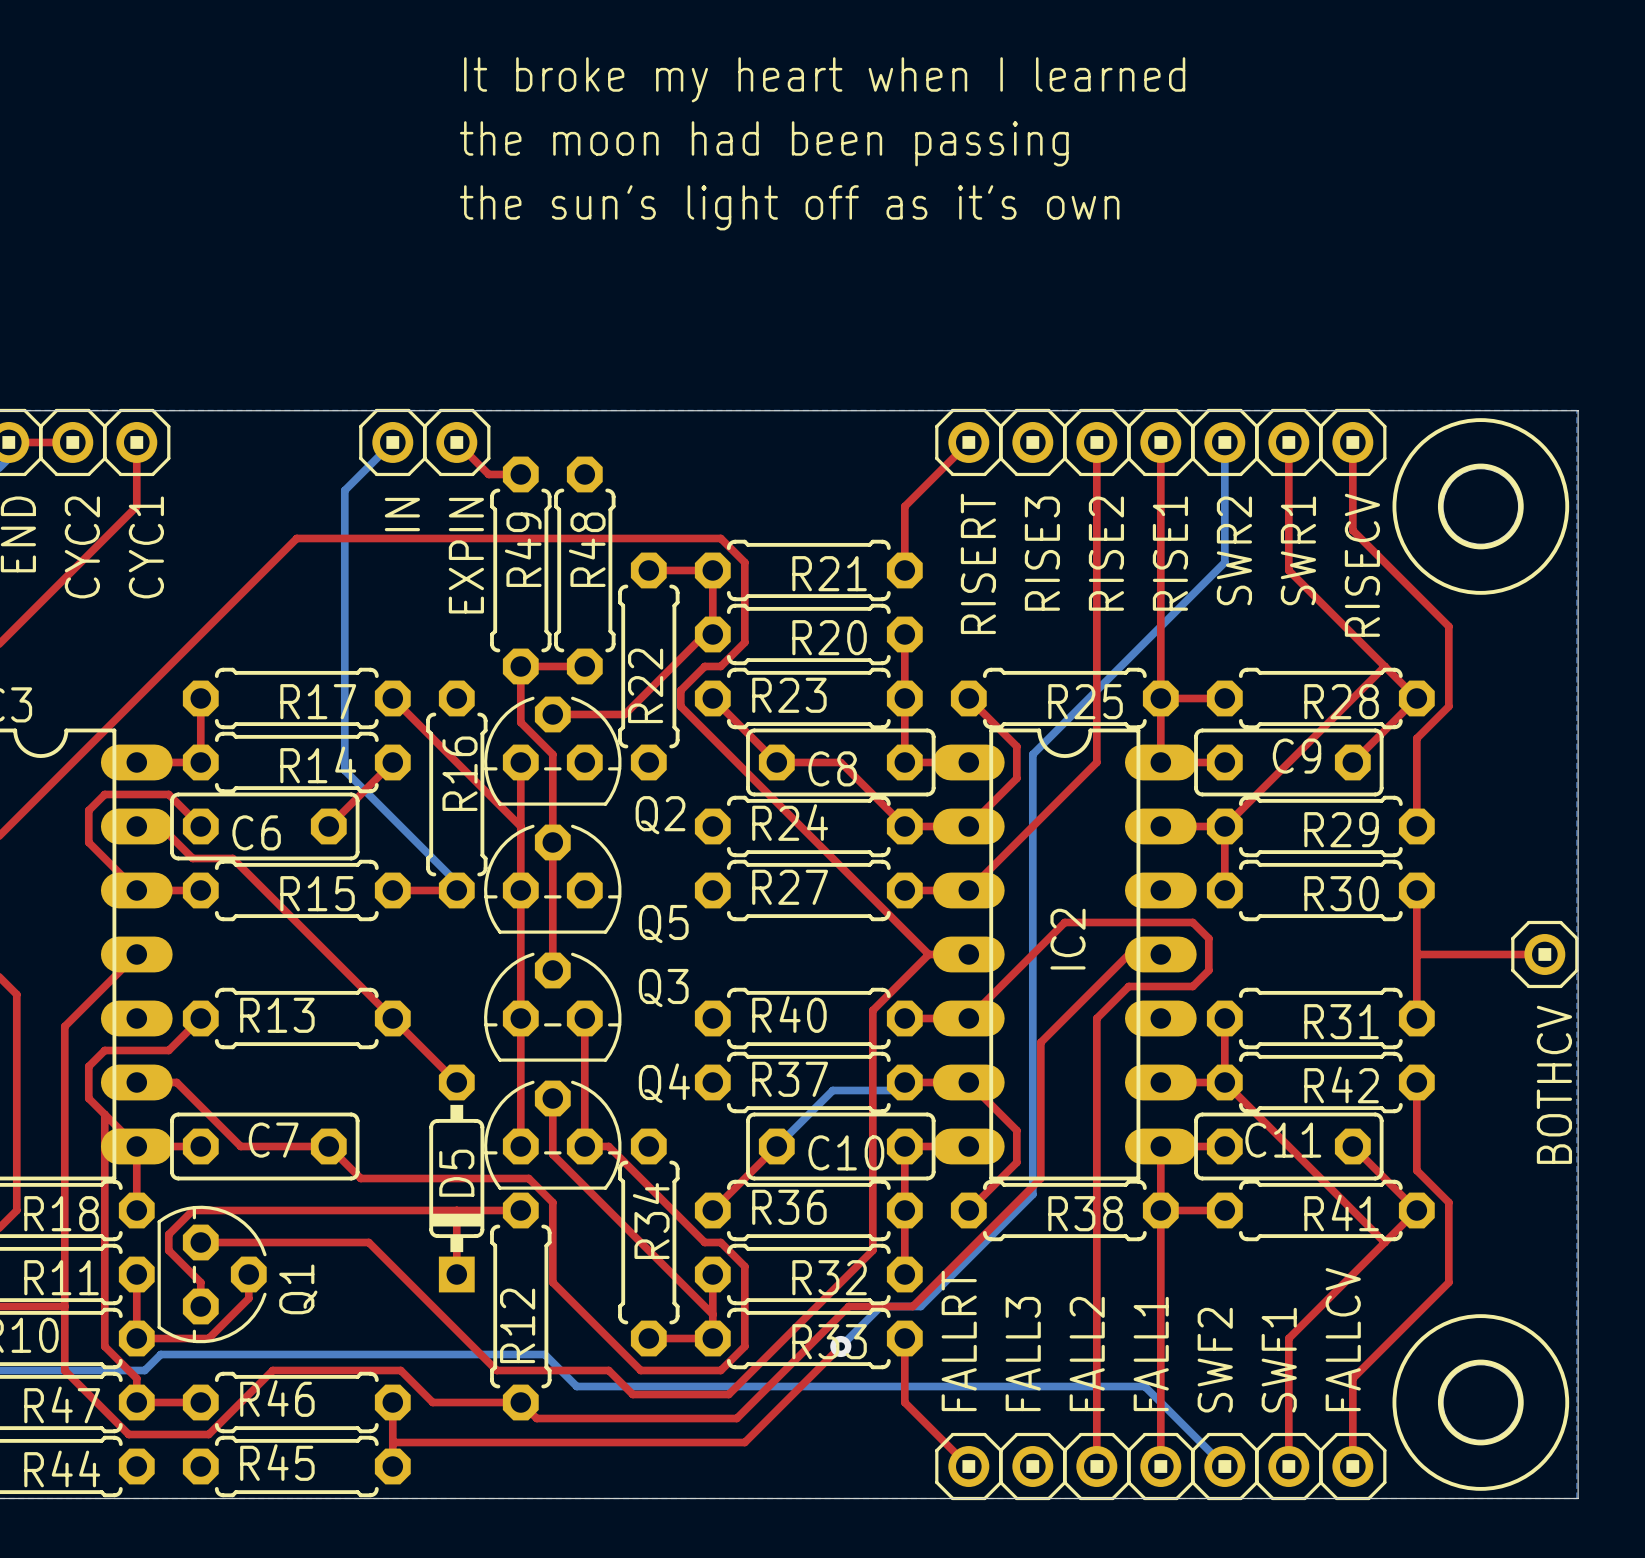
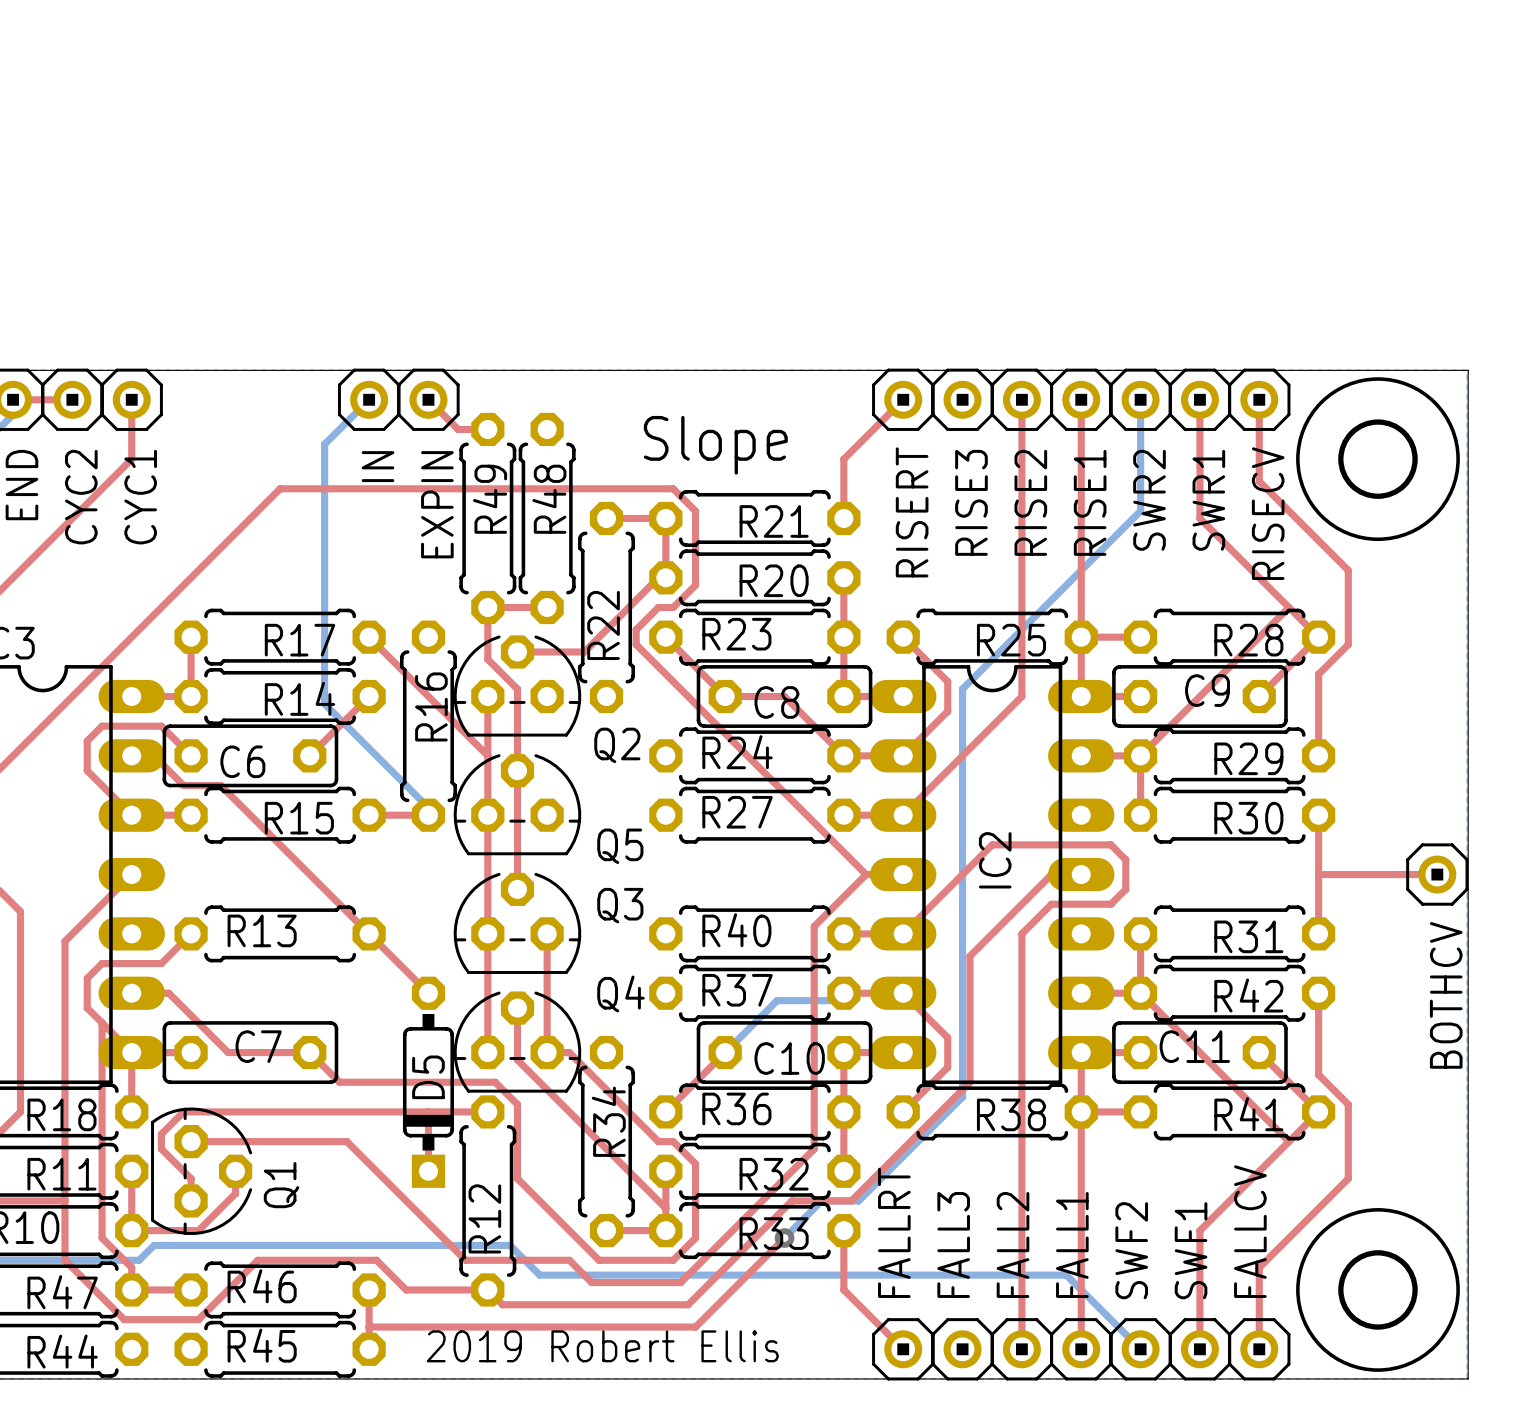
text: It broke my heart when I learned (824, 79) -> none
text: the moon had been passing (764, 143) -> none
text: the sun's light off as it's own (789, 207) -> none
text: none -> Slope (715, 445)
text: none -> 2019 Robert Ellis (602, 1346)

